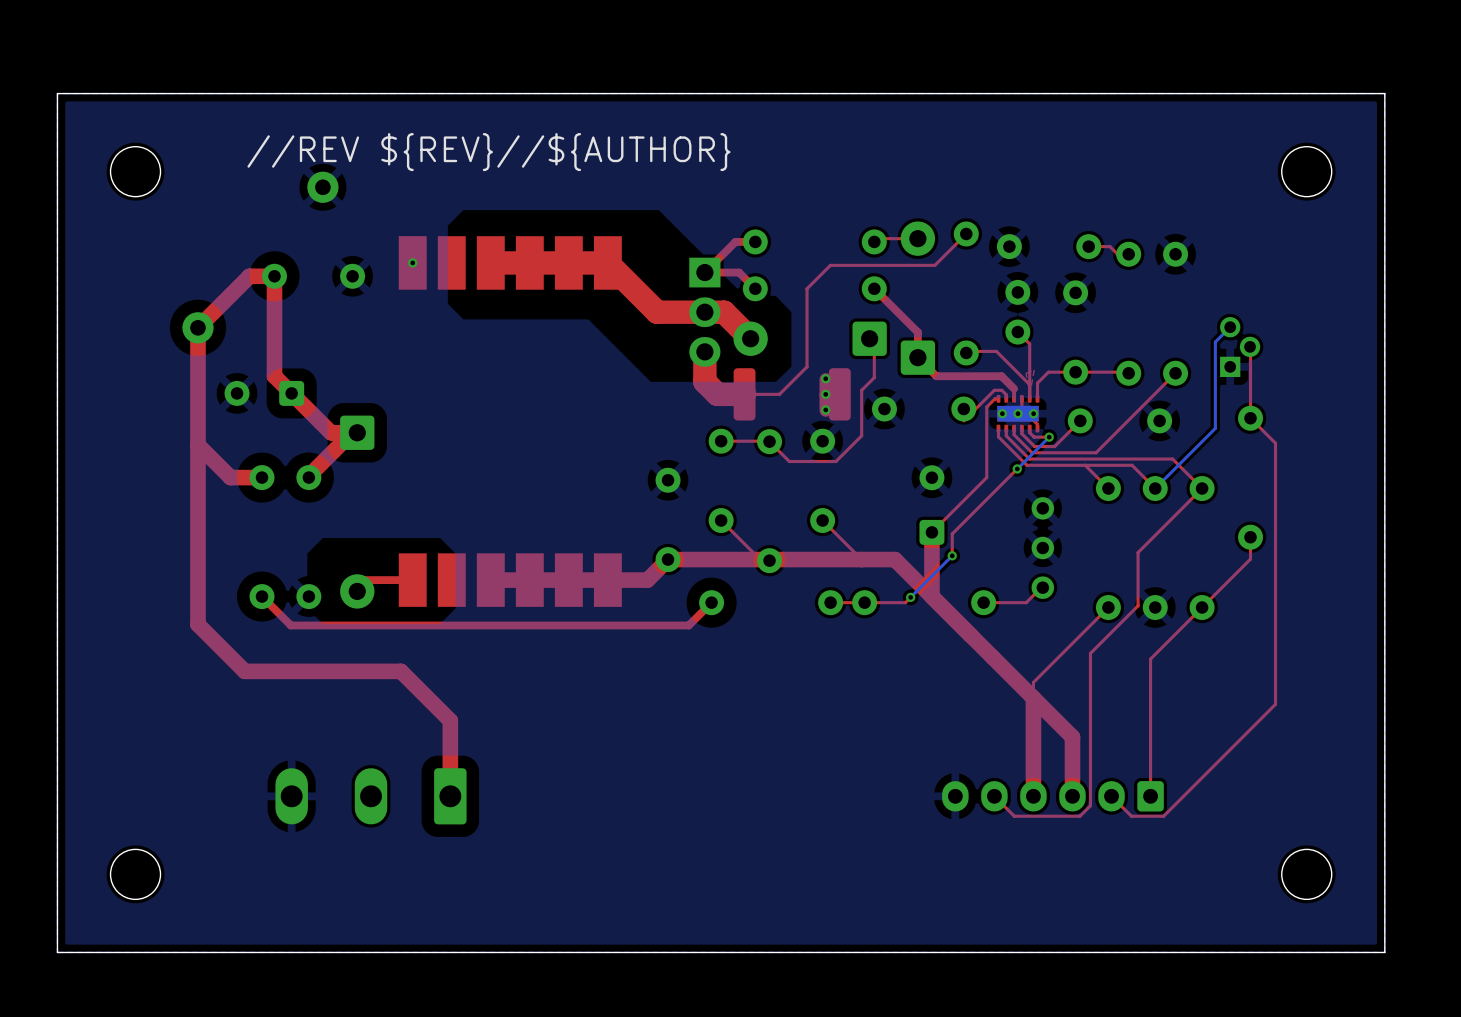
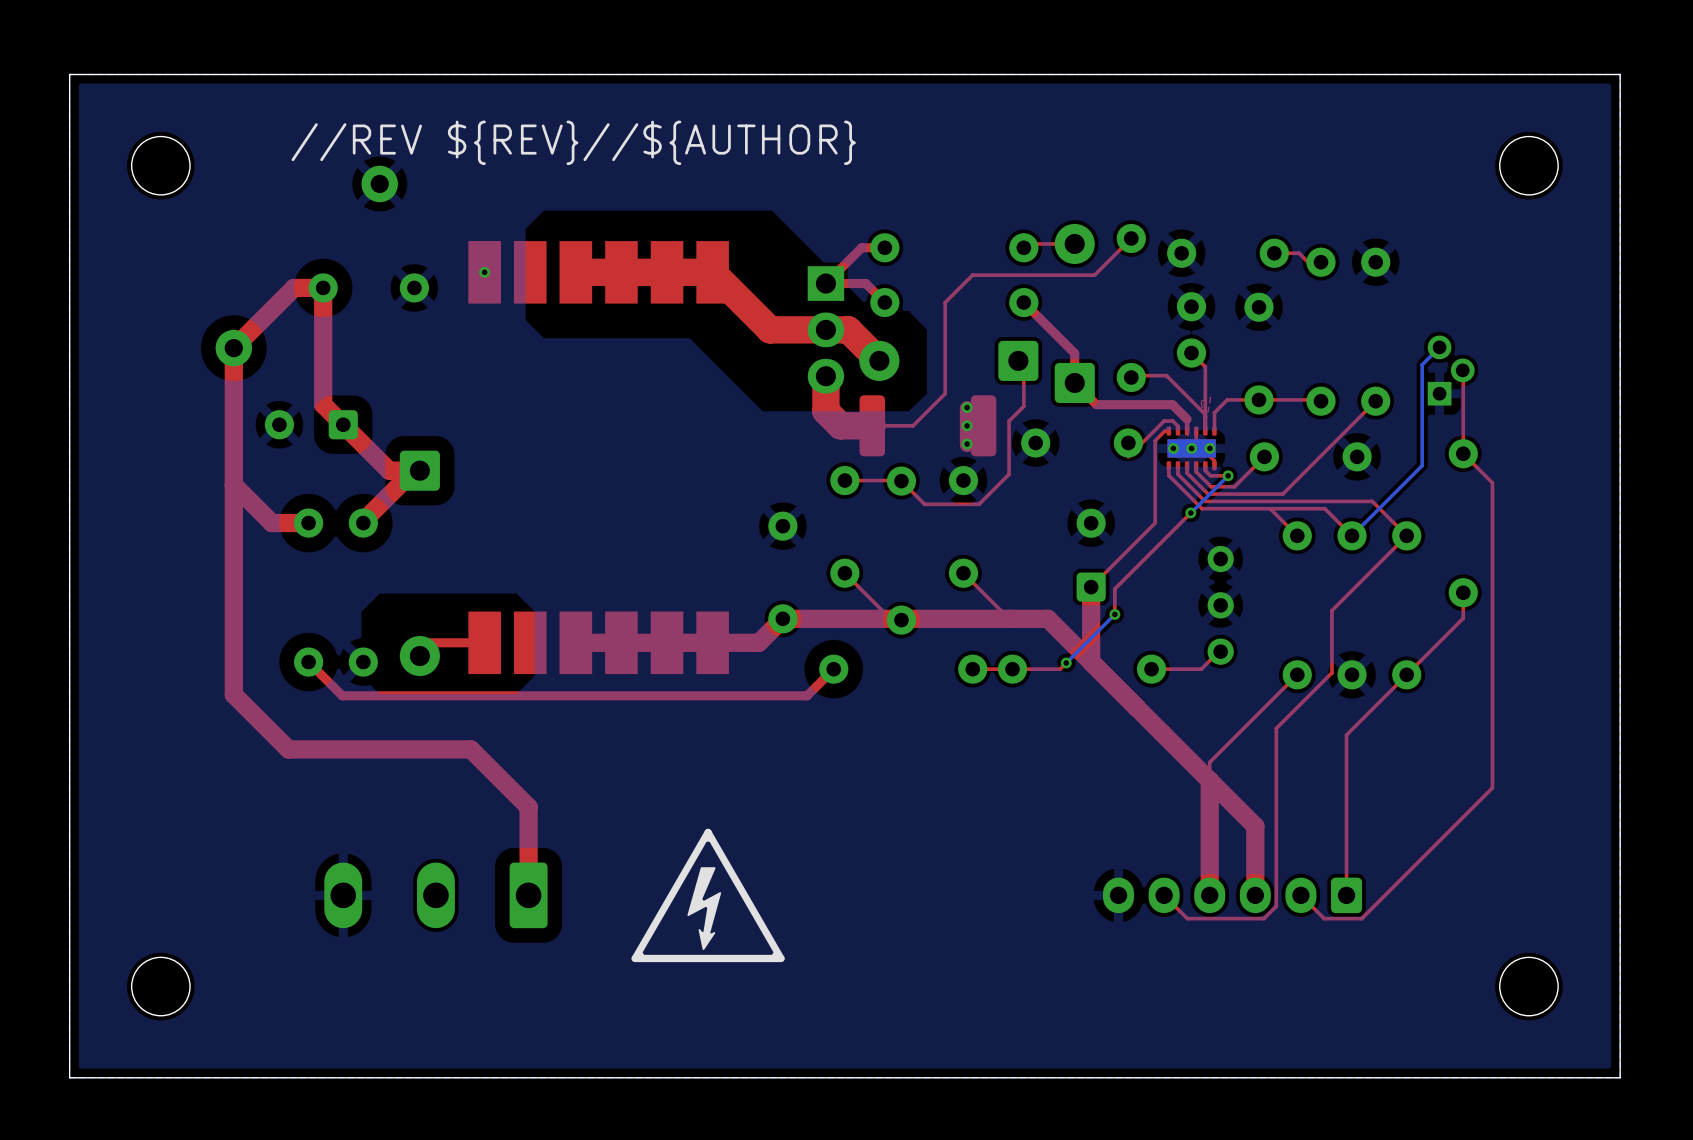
drawing: none -> [631, 828, 785, 963]

